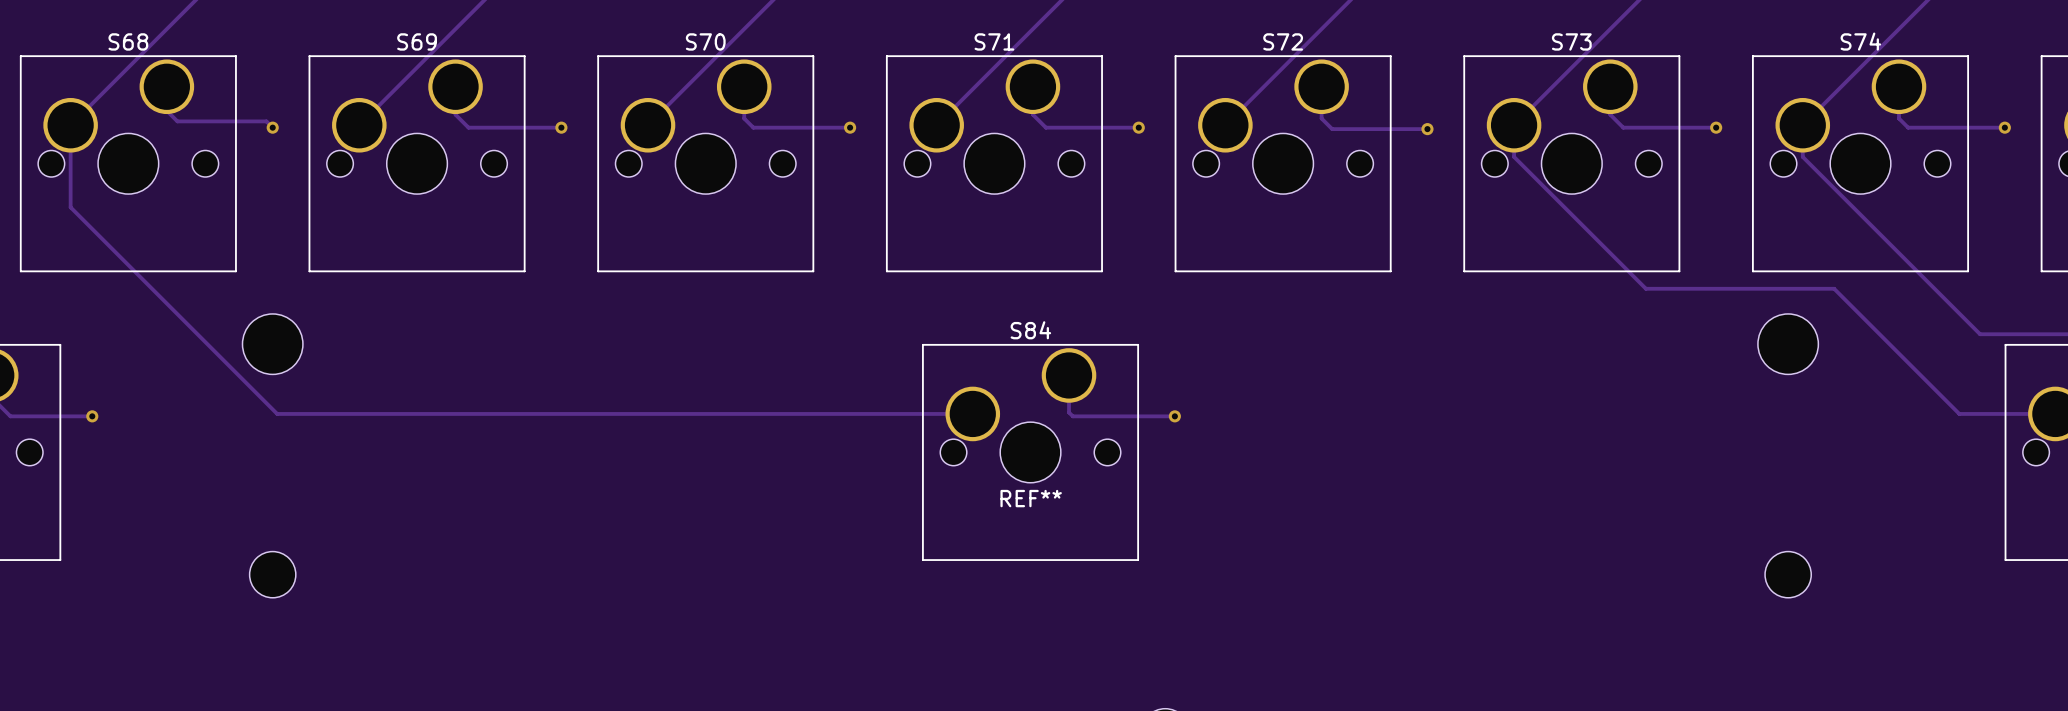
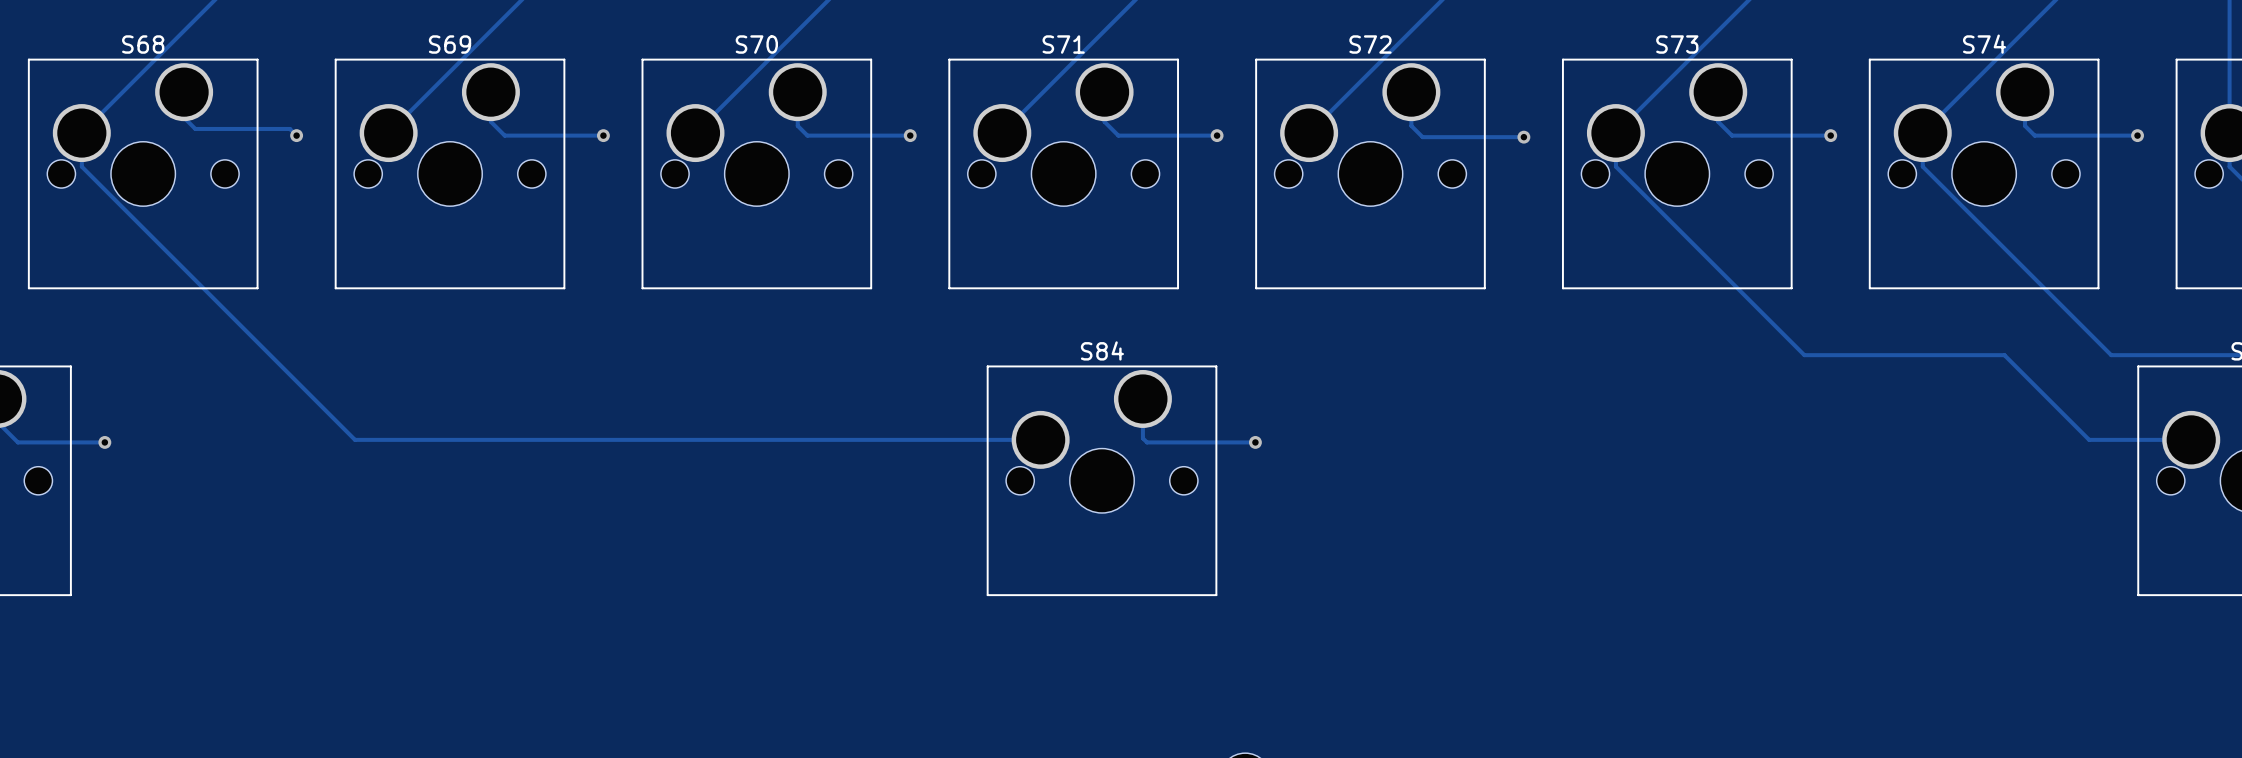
track: (70, 156) (70, 207) (277, 413) (327, 413) -> (81, 166) (355, 439)
track: (1645, 288) (1834, 288) (1879, 334) -> (1756, 306) (1804, 355) (2004, 355)
REF**: (1030, 455) -> none

